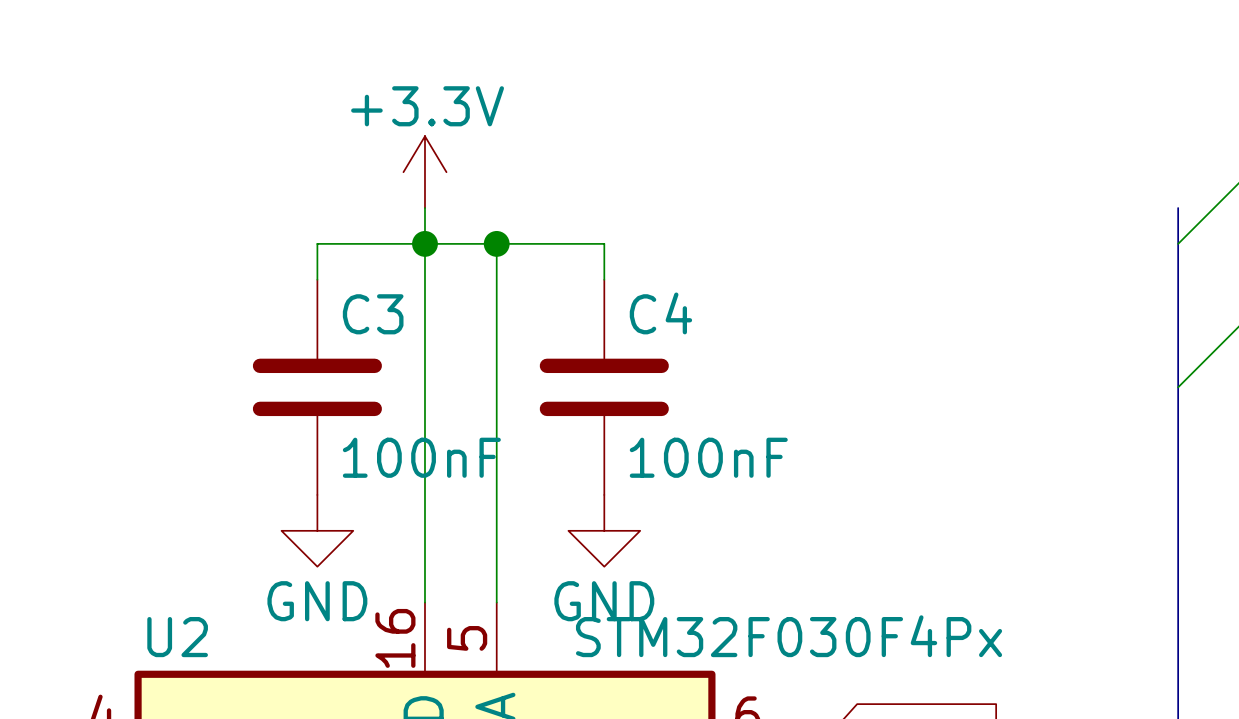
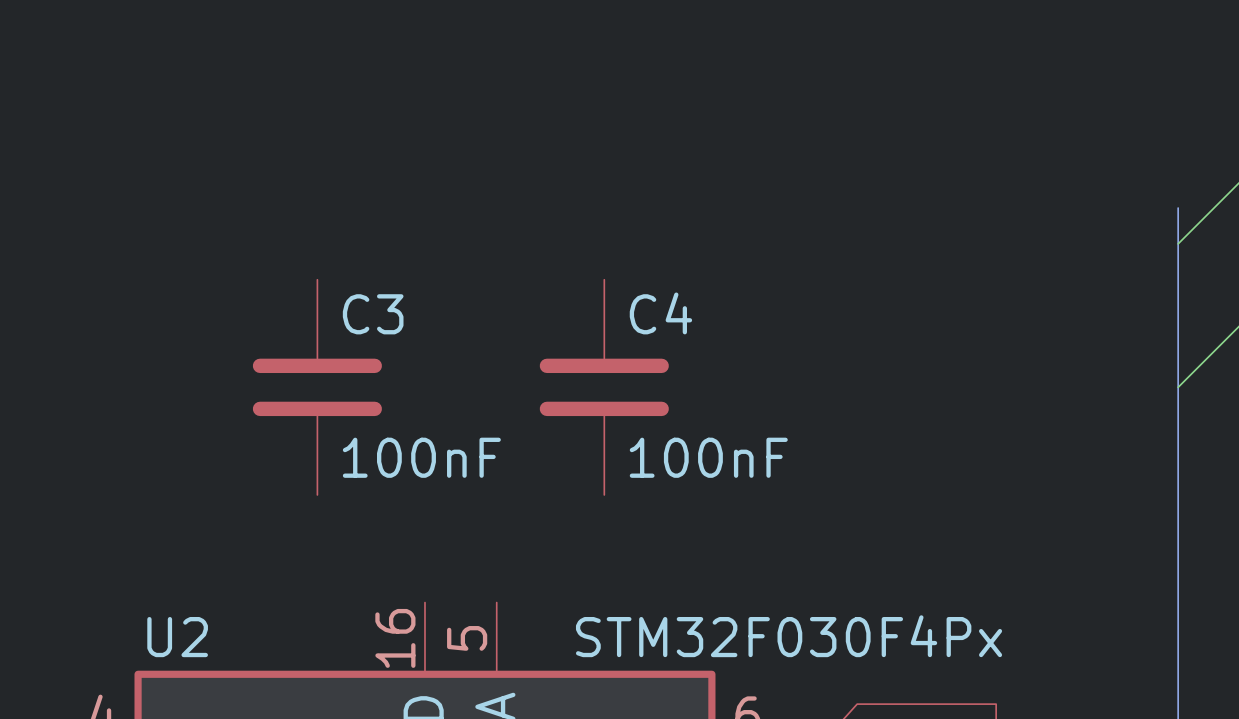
power symbol: +3.3V (424, 172) -> none
wire: (424, 208) (424, 602) -> none
junction: (424, 243) -> none
wire: (496, 243) (496, 602) -> none
junction: (496, 243) -> none
wire: (317, 279) (317, 243) (604, 243) (604, 279) -> none
power symbol: GND (317, 530) -> none
power symbol: GND (604, 530) -> none

